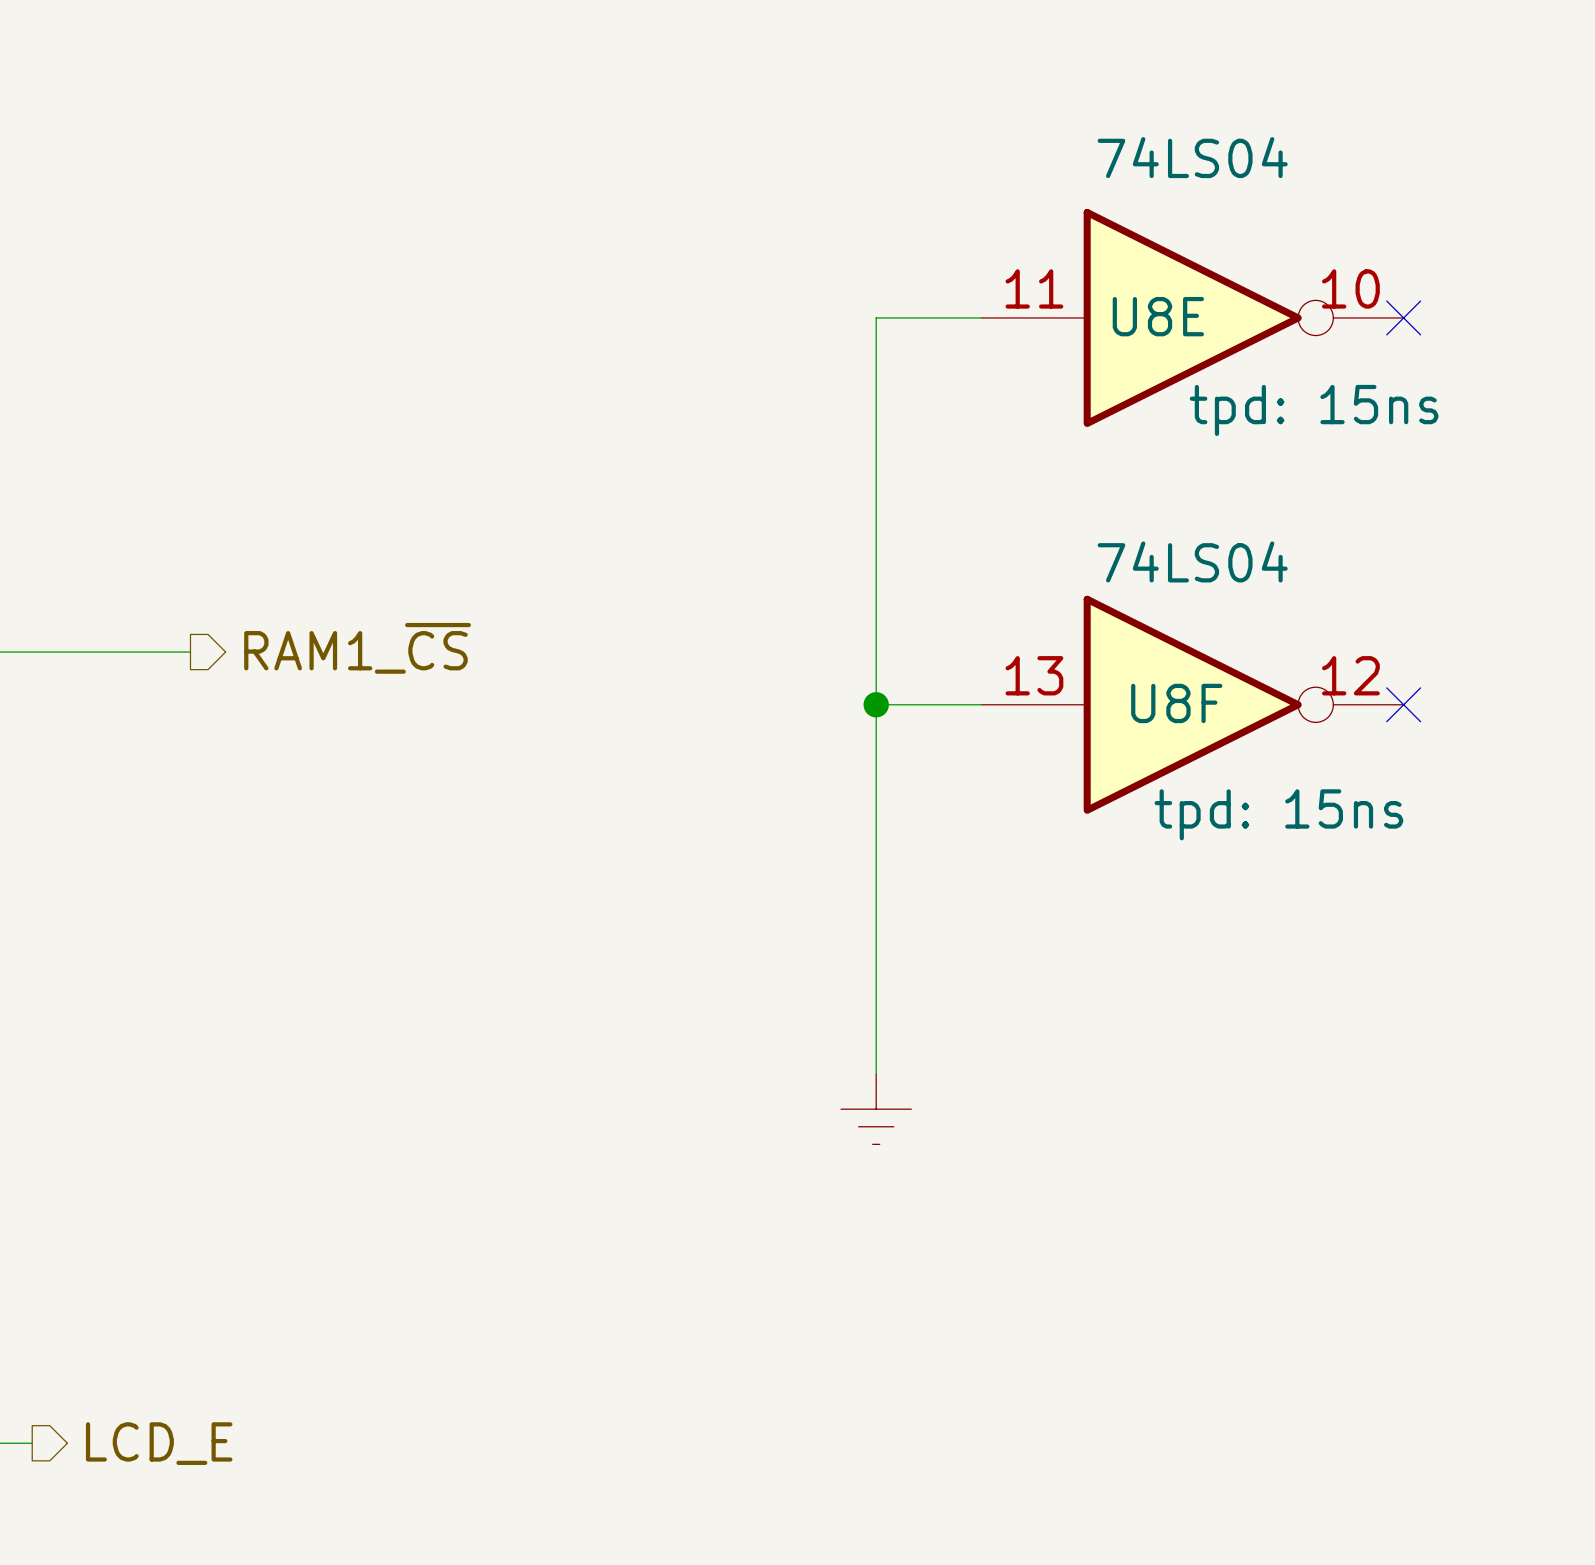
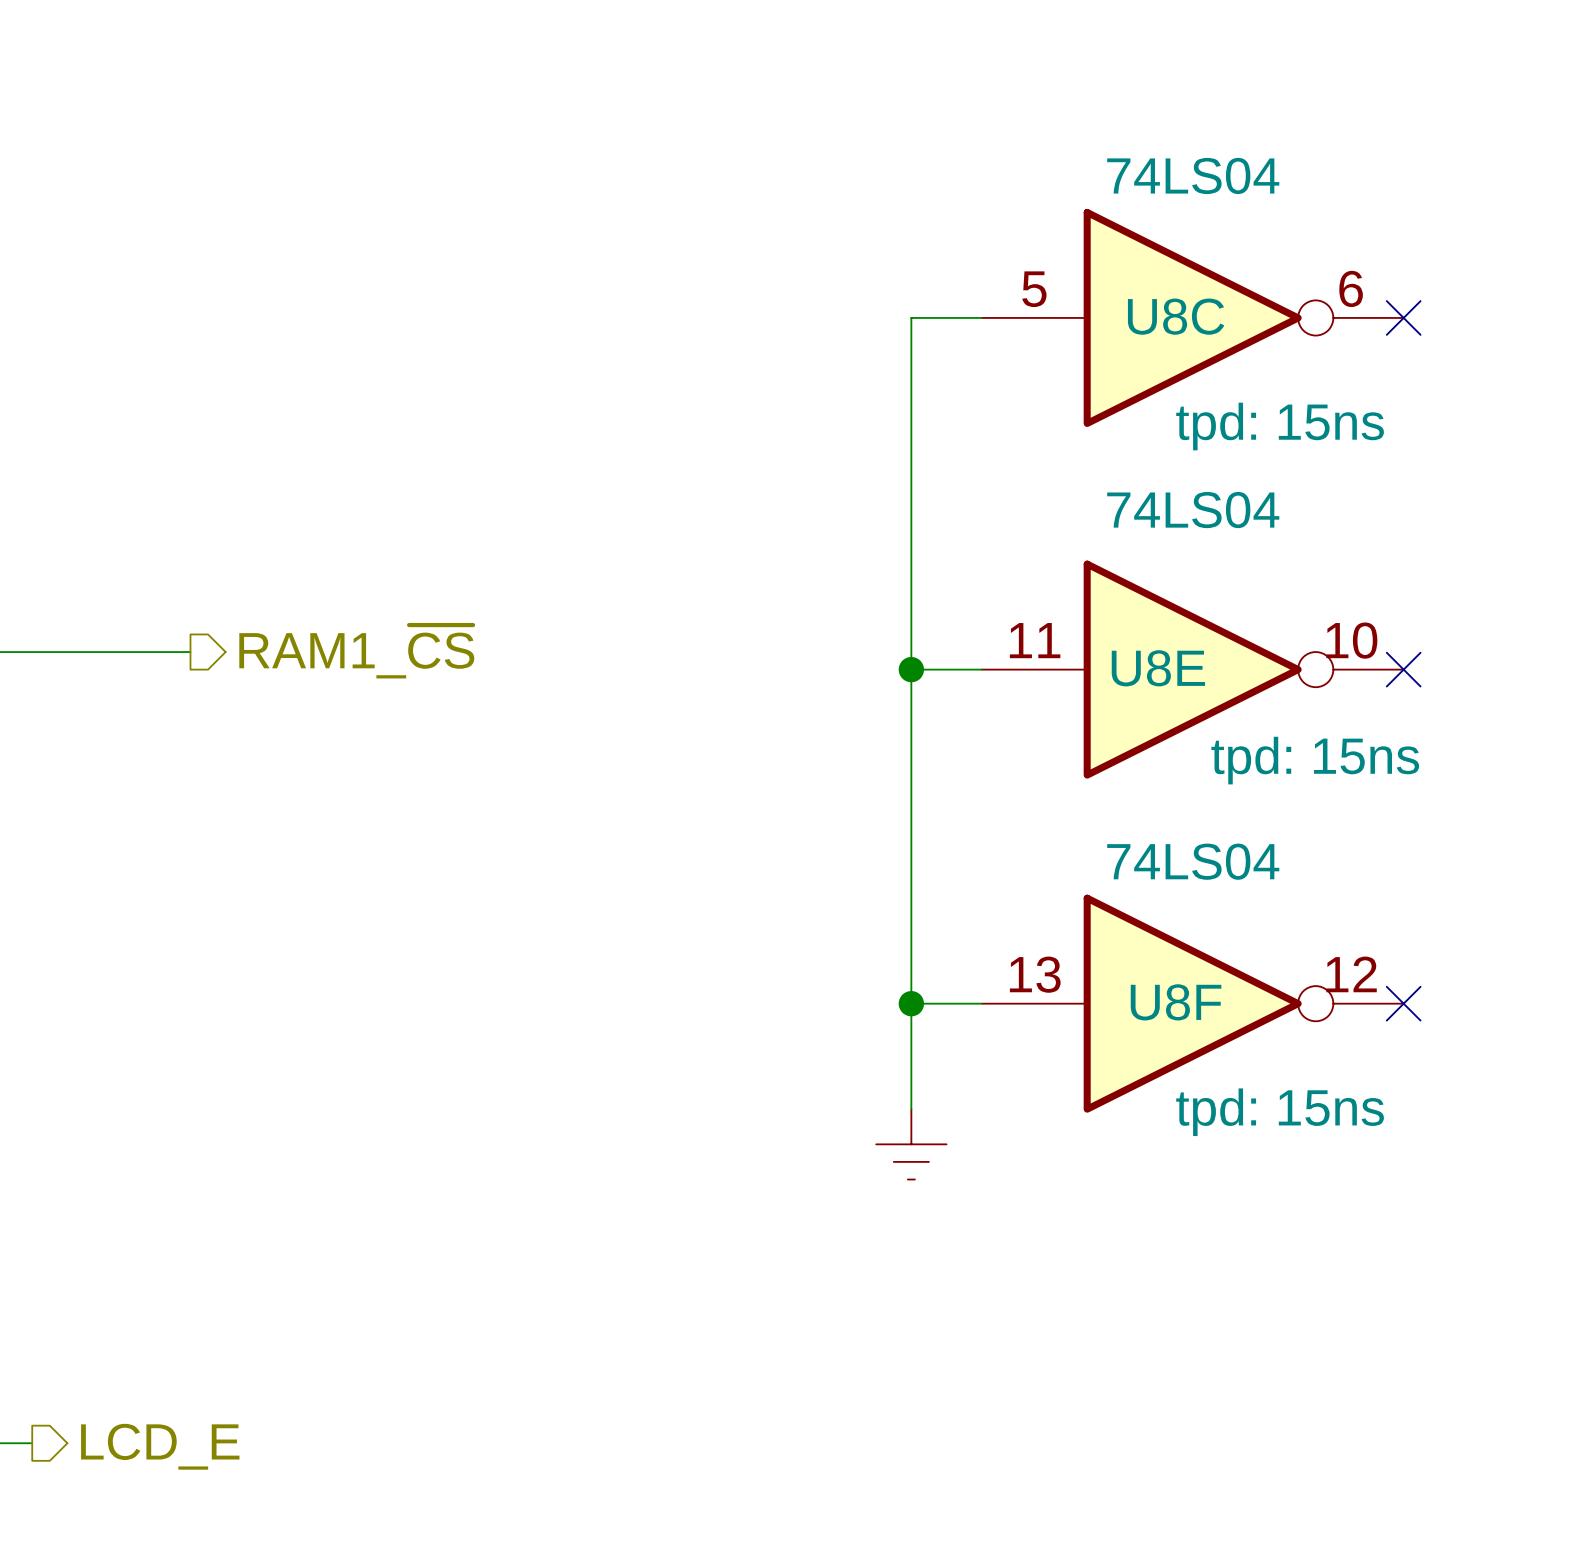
wire: (911, 317) (876, 317) (876, 1074) -> (911, 317) (911, 1109)
U8E position: (1192, 317) -> (1192, 669)
U8C: none -> 74LS04 (1192, 317)
wire: none -> (911, 669) (981, 669)
wire: (876, 704) (981, 704) -> none
junction position: (876, 704) -> (911, 669)
U8F position: (1192, 704) -> (1192, 1003)
no-connect mark position: (1403, 704) -> (1403, 669)
wire: none -> (911, 1003) (981, 1003)
junction: none -> (911, 1003)
no-connect mark: none -> (1403, 1003)
power symbol position: (876, 1109) -> (911, 1144)

